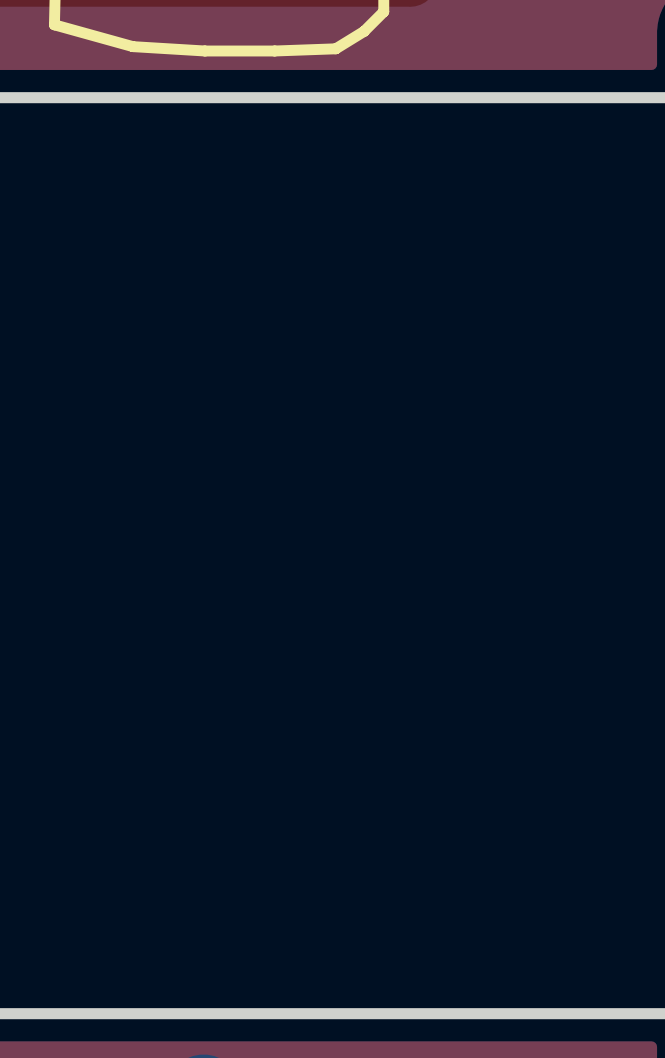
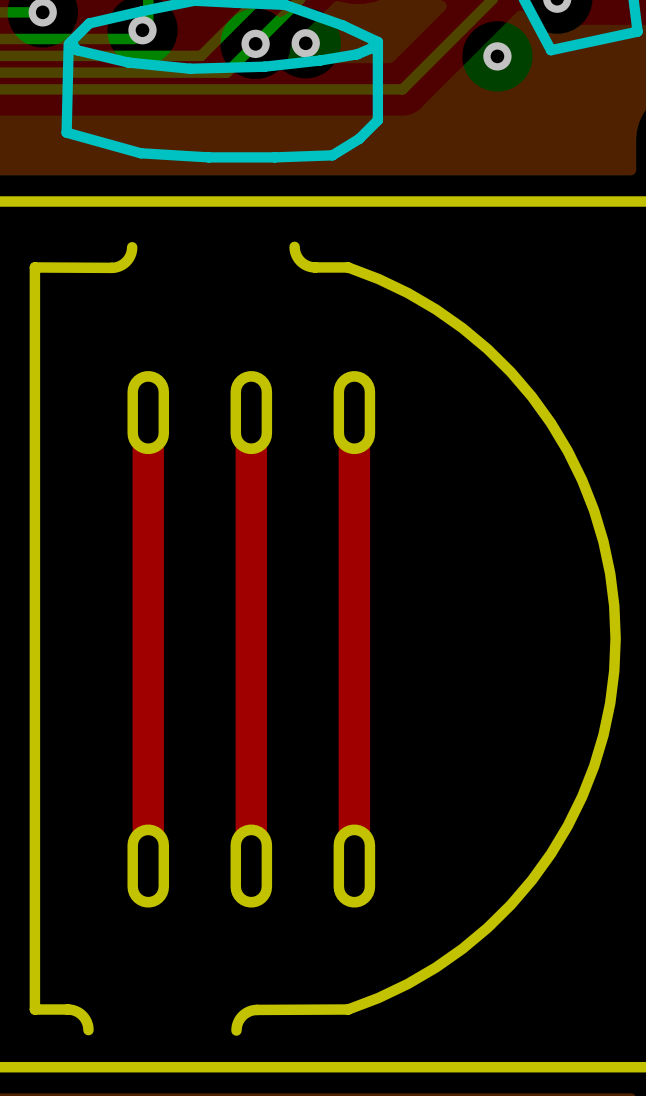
board edge: none -> (294, 246) (298, 259) (307, 265) (348, 267) (407, 293) (436, 309) (487, 349) (531, 396) (567, 451) (594, 510) (610, 573) (614, 605) (614, 671) (603, 735) (594, 766) (567, 825) (531, 880) (487, 927) (436, 967) (378, 997) (348, 1009) (251, 1010) (240, 1017) (236, 1030)
board edge: none -> (132, 247) (127, 259) (116, 267) (34, 267) (34, 1009) (75, 1011) (84, 1017) (88, 1030)
top track: none -> (354, 411) (354, 869)
part: none -> (251, 412)
top track: none -> (148, 415) (148, 873)
top track: none -> (251, 415) (251, 873)
part: none -> (251, 866)

